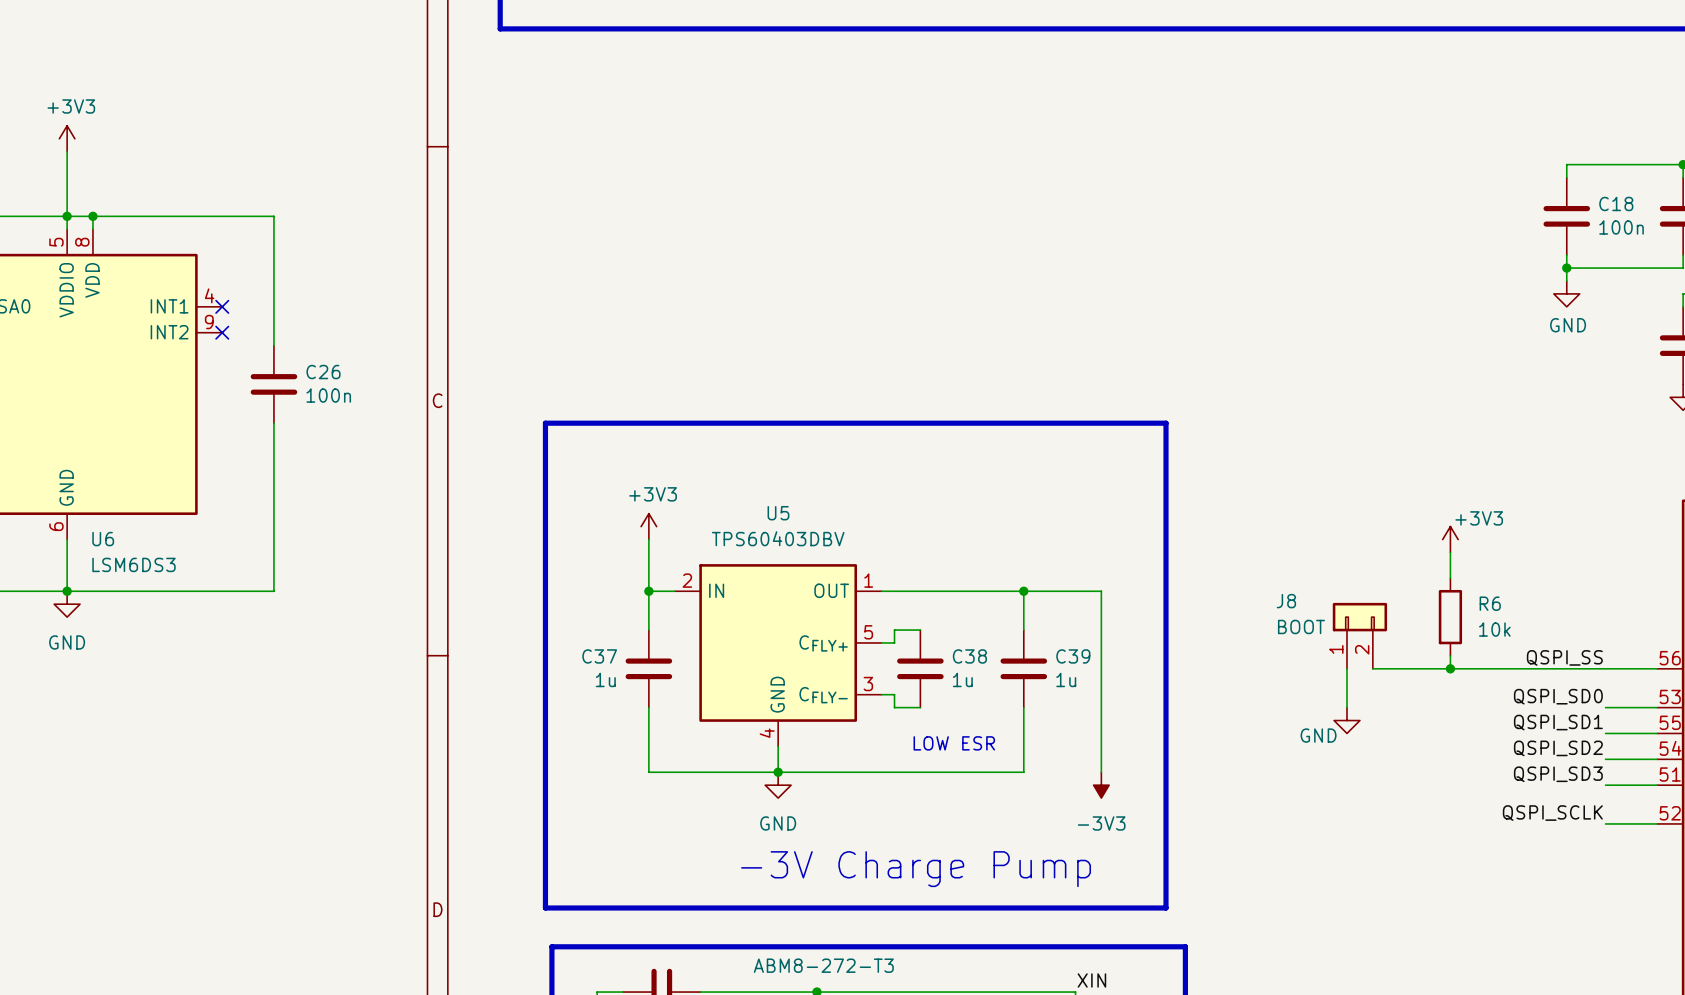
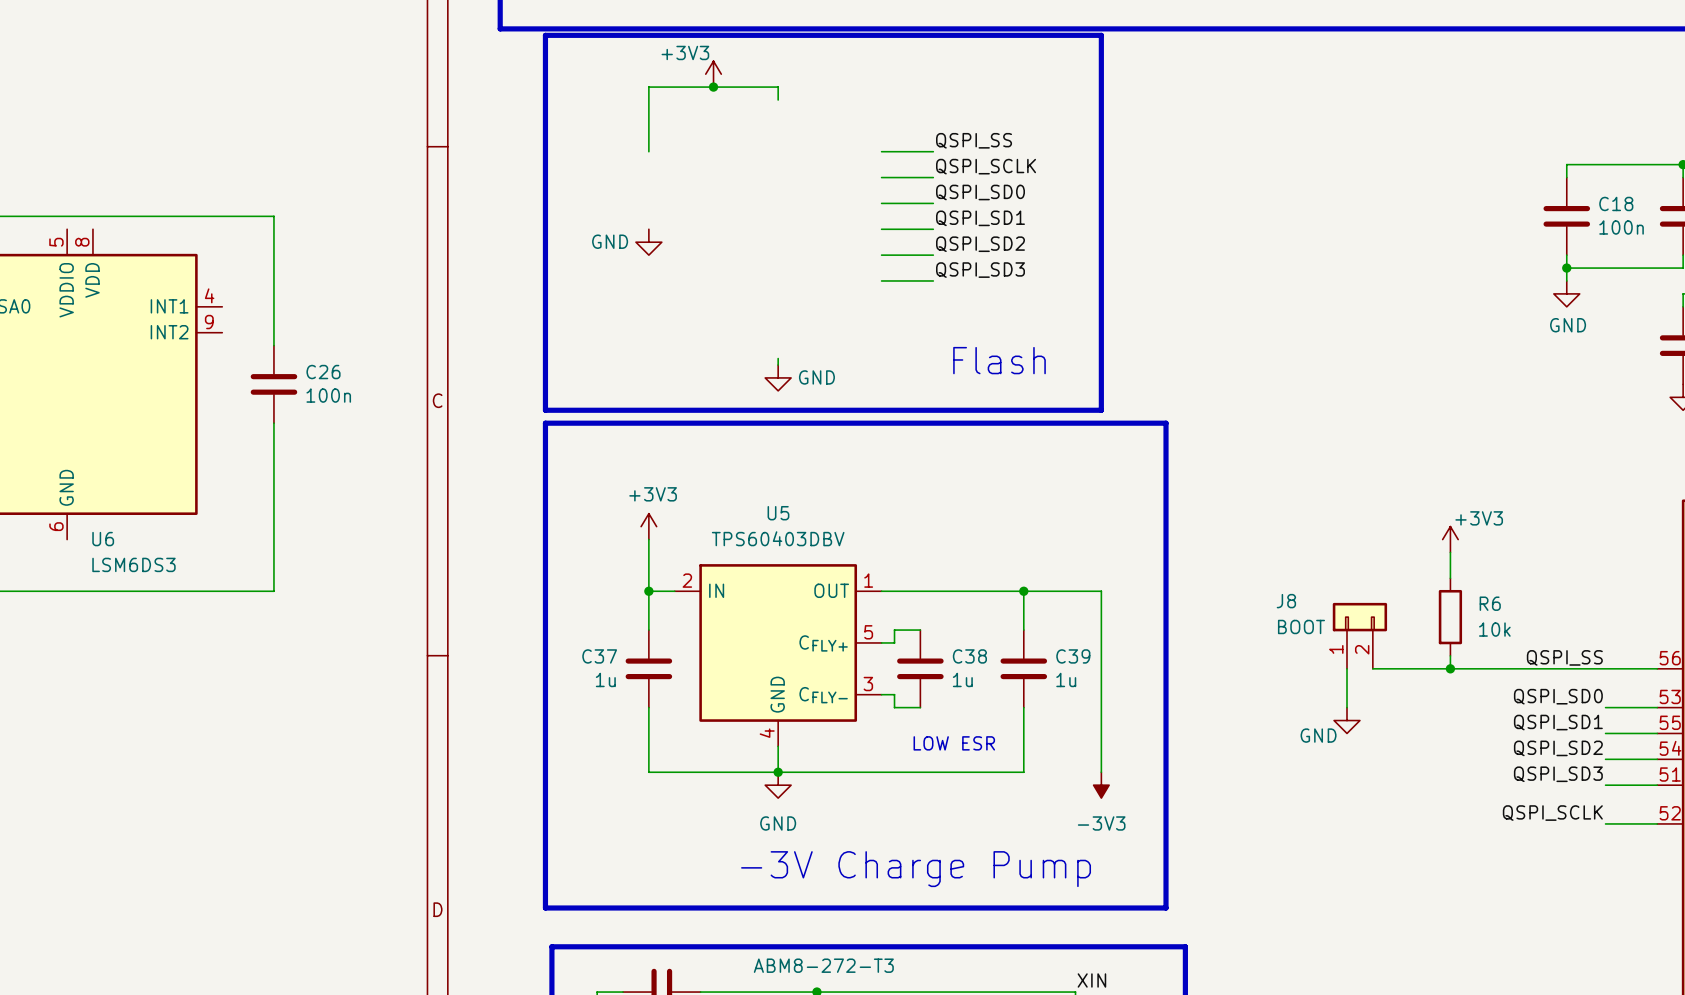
line: none -> (545, 35) (1101, 35) (1101, 410) (545, 410) (545, 35)
power symbol: none -> +3V3 (713, 74)
junction: none -> (713, 87)
wire: none -> (778, 99) (778, 87) (648, 87) (648, 151)
power symbol: +3V3 (67, 138) -> none
label: none -> QSPI_SS (974, 140)
wire: (67, 151) (67, 229) -> none
wire: none -> (881, 151) (933, 151)
label: none -> QSPI_SCLK (986, 166)
wire: none -> (881, 177) (933, 177)
label: none -> QSPI_SD0 (980, 192)
wire: none -> (881, 203) (933, 203)
junction: (67, 216) -> none
wire: (92, 216) (92, 229) -> none
junction: (92, 216) -> none
label: none -> QSPI_SD1 (980, 218)
wire: none -> (881, 229) (933, 229)
power symbol: none -> GND (648, 242)
label: none -> QSPI_SD2 (980, 244)
wire: none -> (881, 255) (933, 255)
label: none -> QSPI_SD3 (980, 270)
wire: none -> (881, 280) (933, 280)
no-connect mark: (222, 306) -> none
no-connect mark: (222, 332) -> none
wire: none -> (778, 358) (778, 365)
text: none -> Flash (999, 360)
power symbol: none -> GND (778, 377)
wire: (67, 539) (67, 591) -> none
junction: (67, 591) -> none
power symbol: GND (67, 604) -> none

